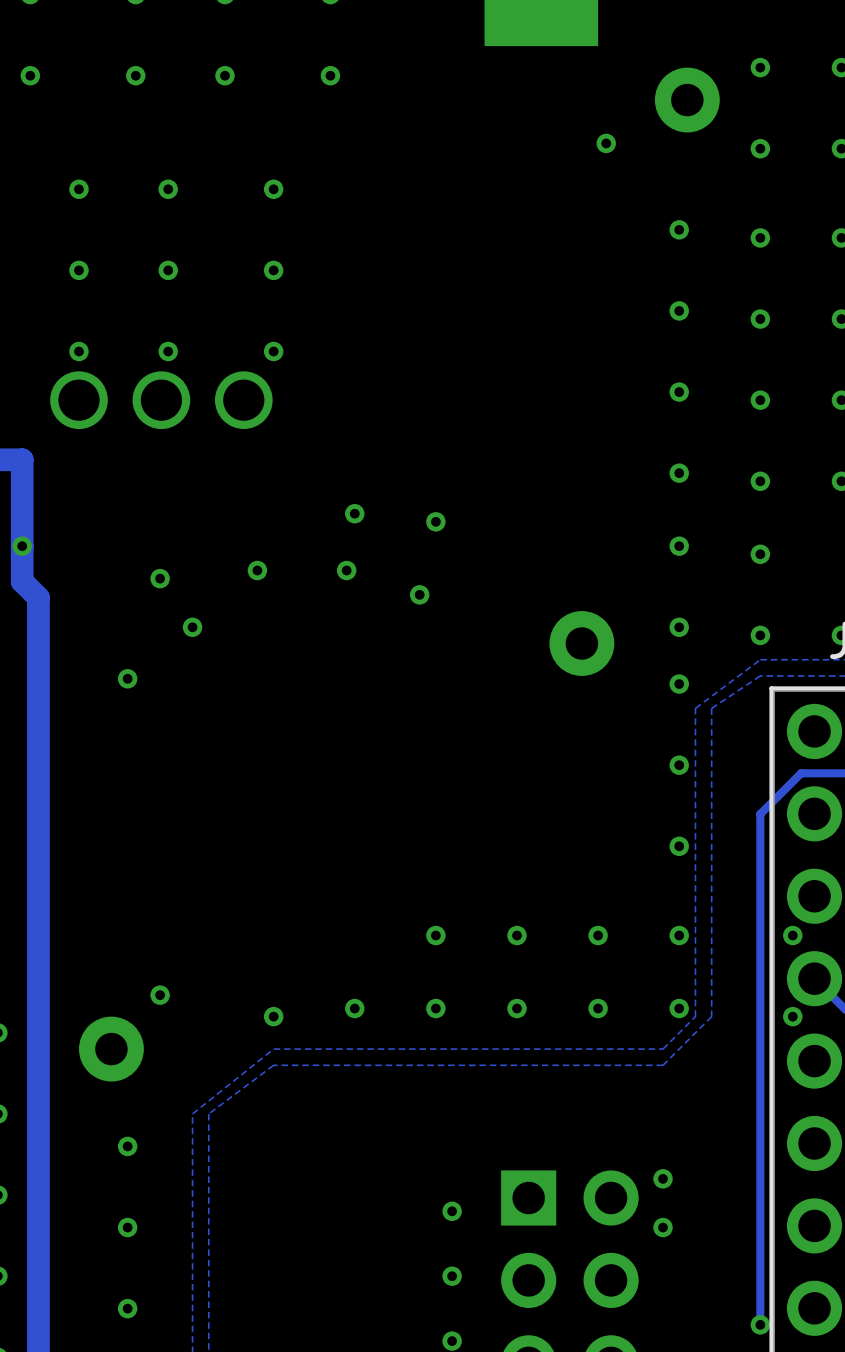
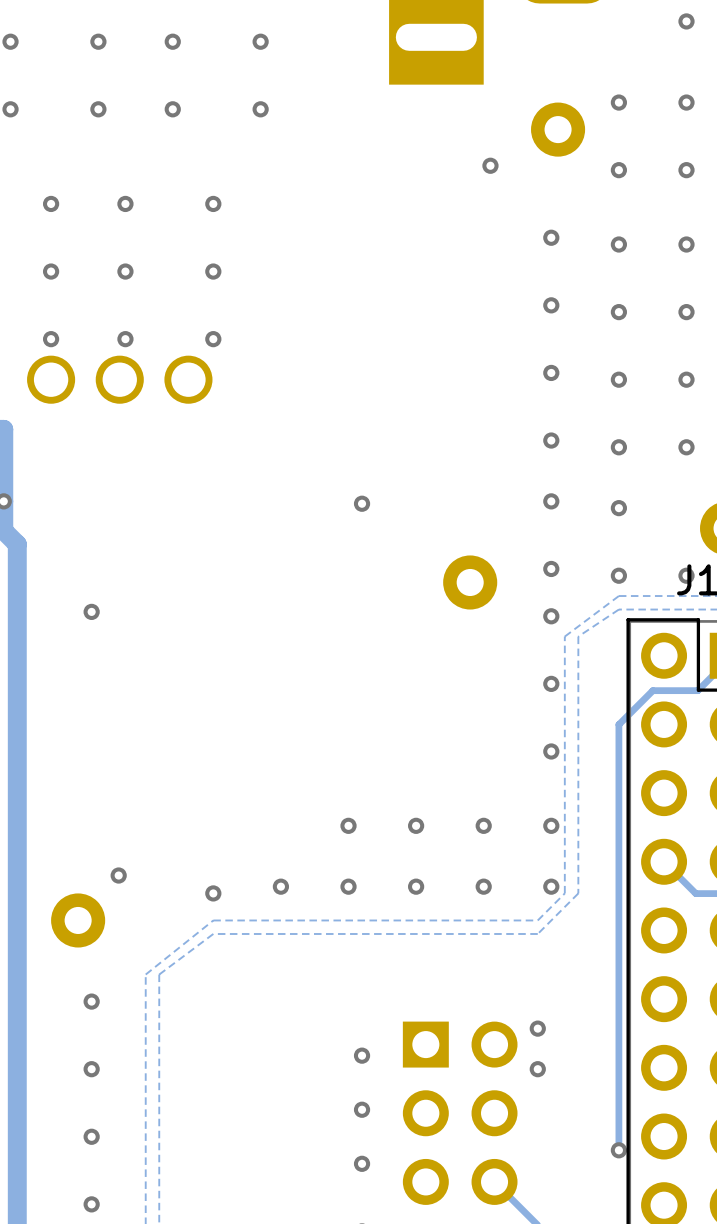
via: (354, 513) -> none
via: (435, 521) -> none
via: none -> (362, 503)
via: (257, 570) -> none
via: (346, 570) -> none
via: (160, 578) -> none
via: (419, 594) -> none
via: (192, 627) -> none
via: (792, 935) -> none
via: (792, 1016) -> none

